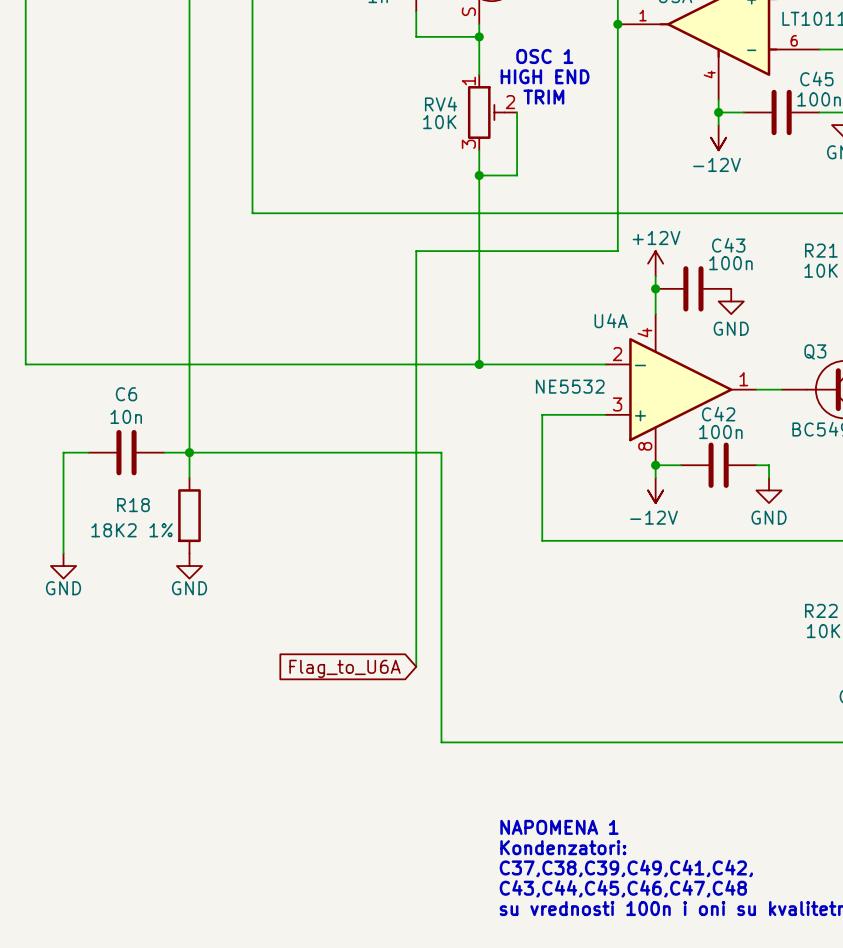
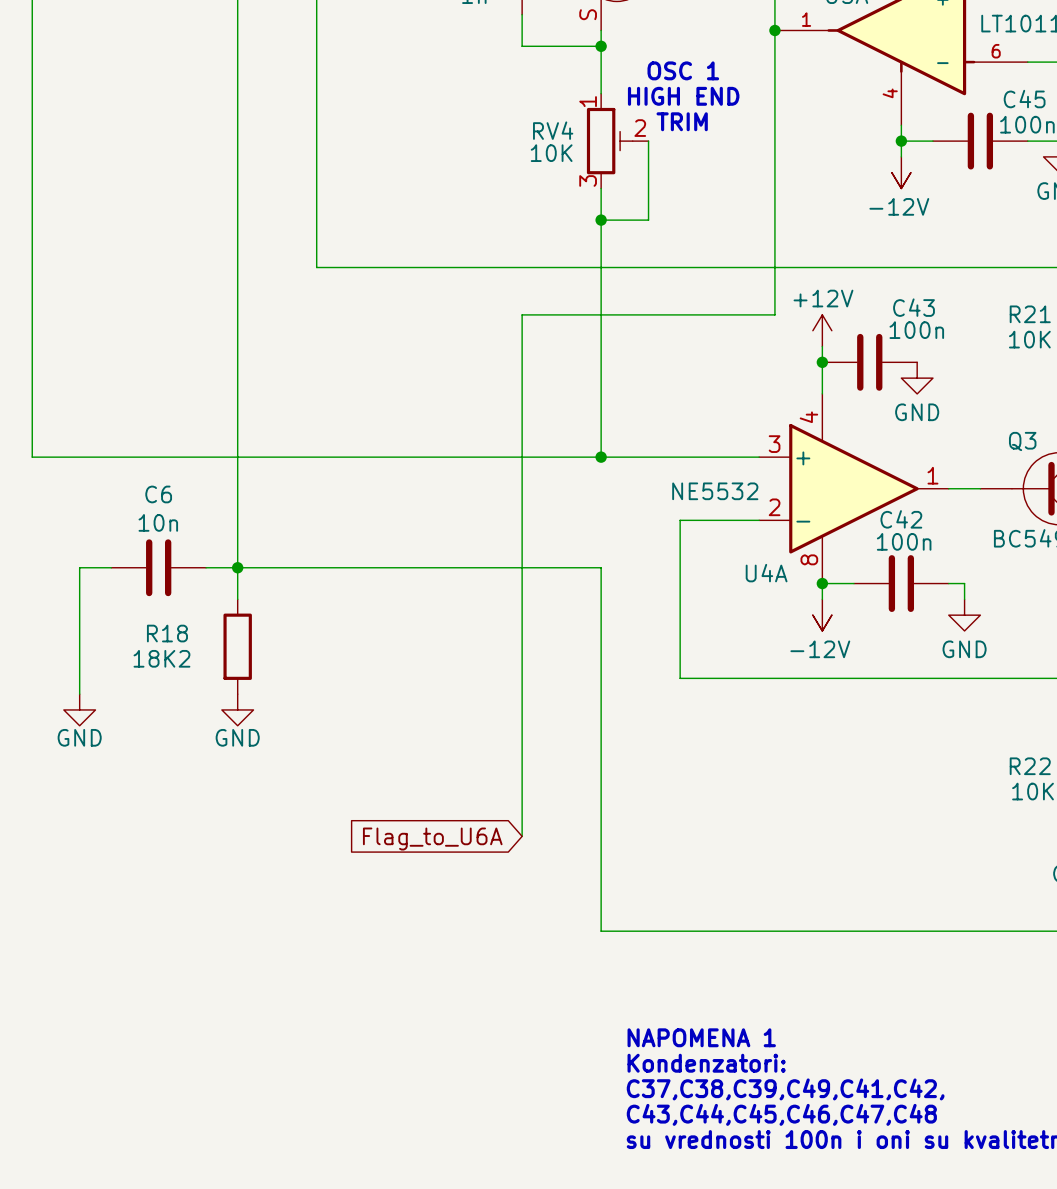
U4A flip: as is (680, 389) -> up-down (853, 488)
wire: (441, 452) (441, 742) (479, 742) -> (553, 567) (601, 567) (601, 931)
R18 value: 18K2 1% (132, 530) -> 18K2 (161, 658)

